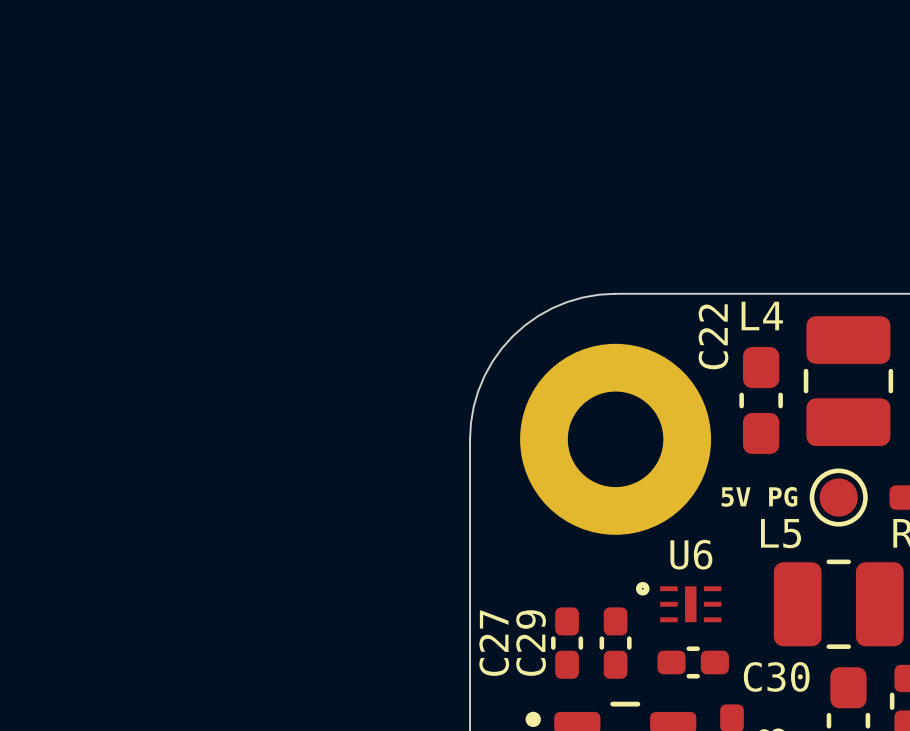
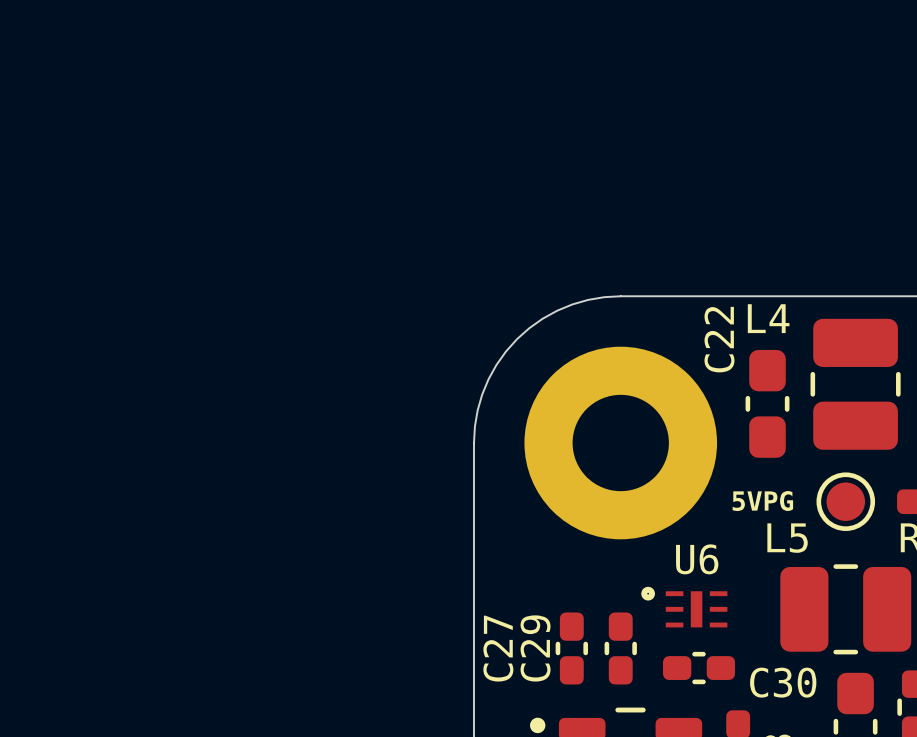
text: none -> 5VPG (762, 501)
5V PG name: 5V PG (759, 496) -> none

